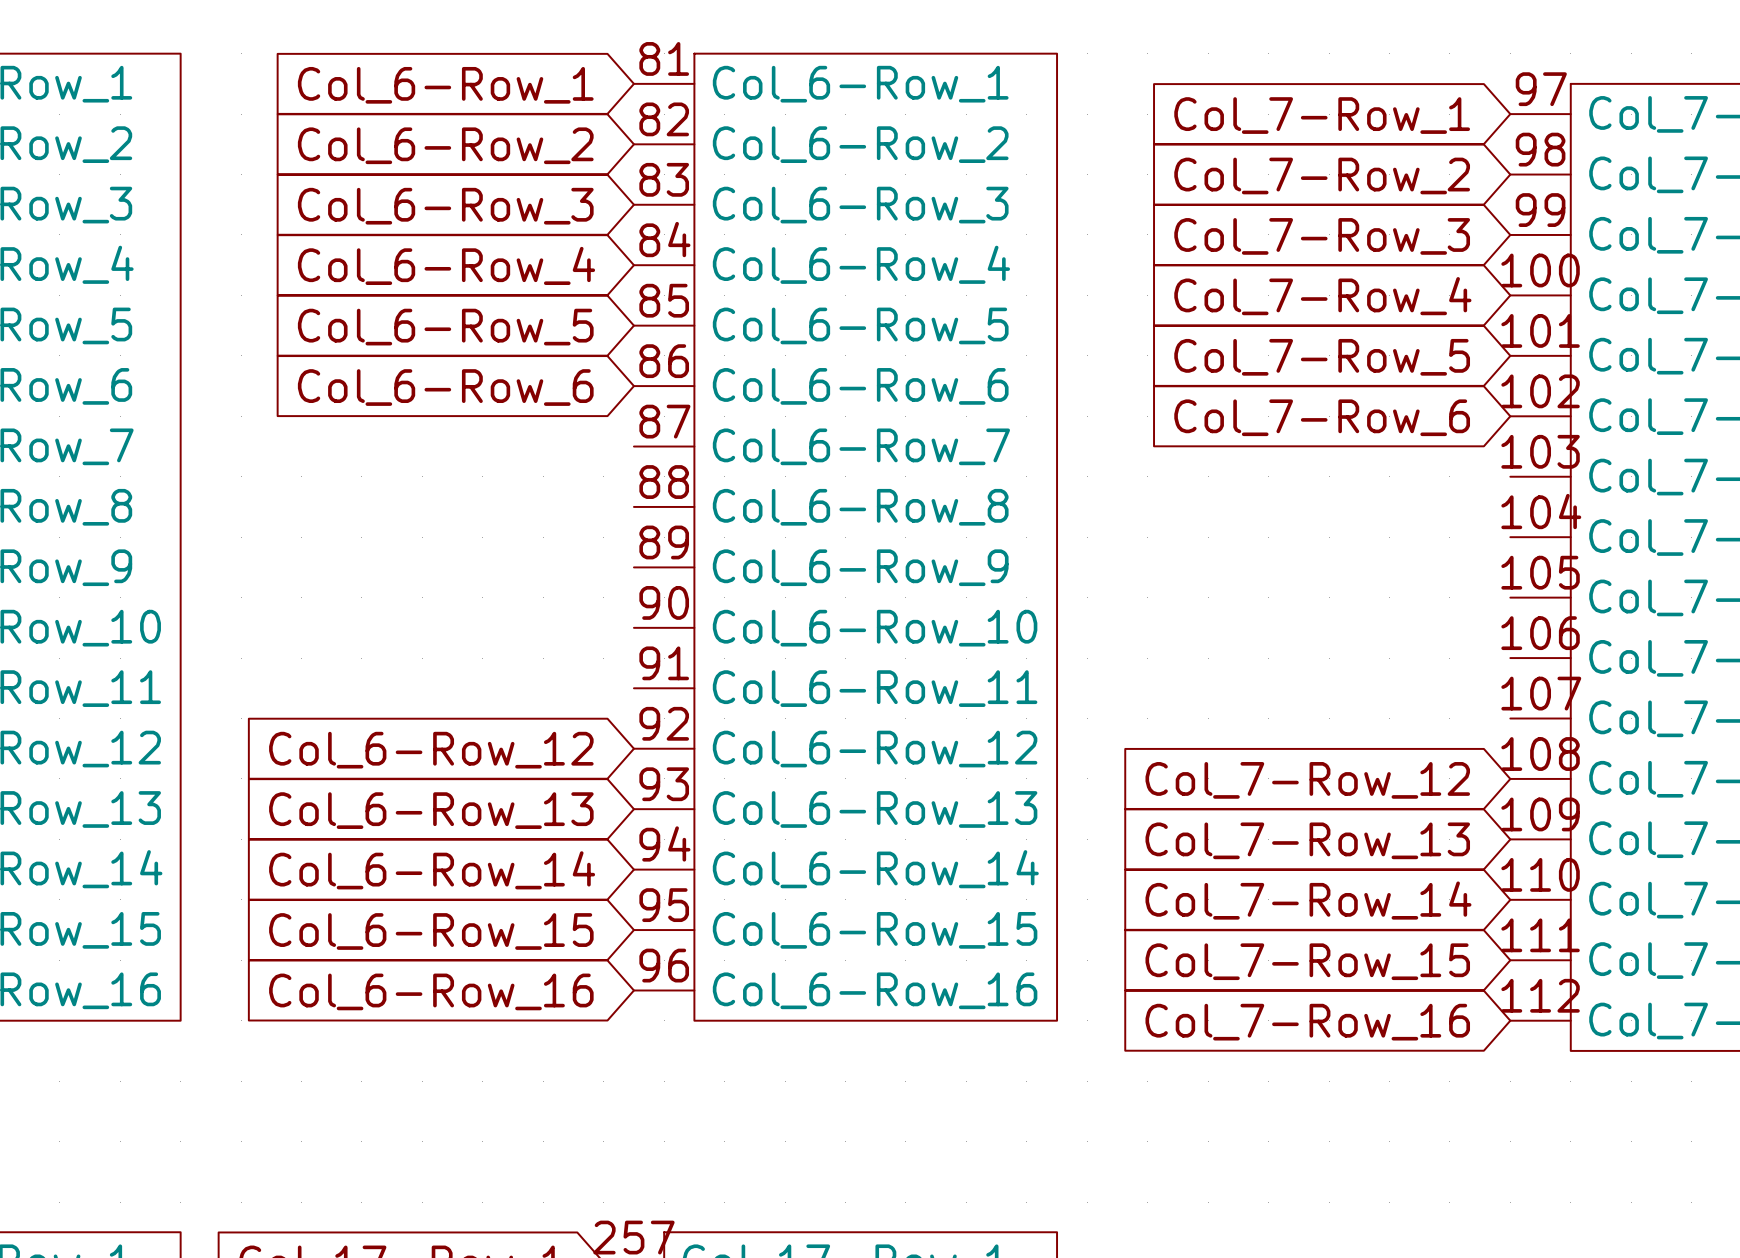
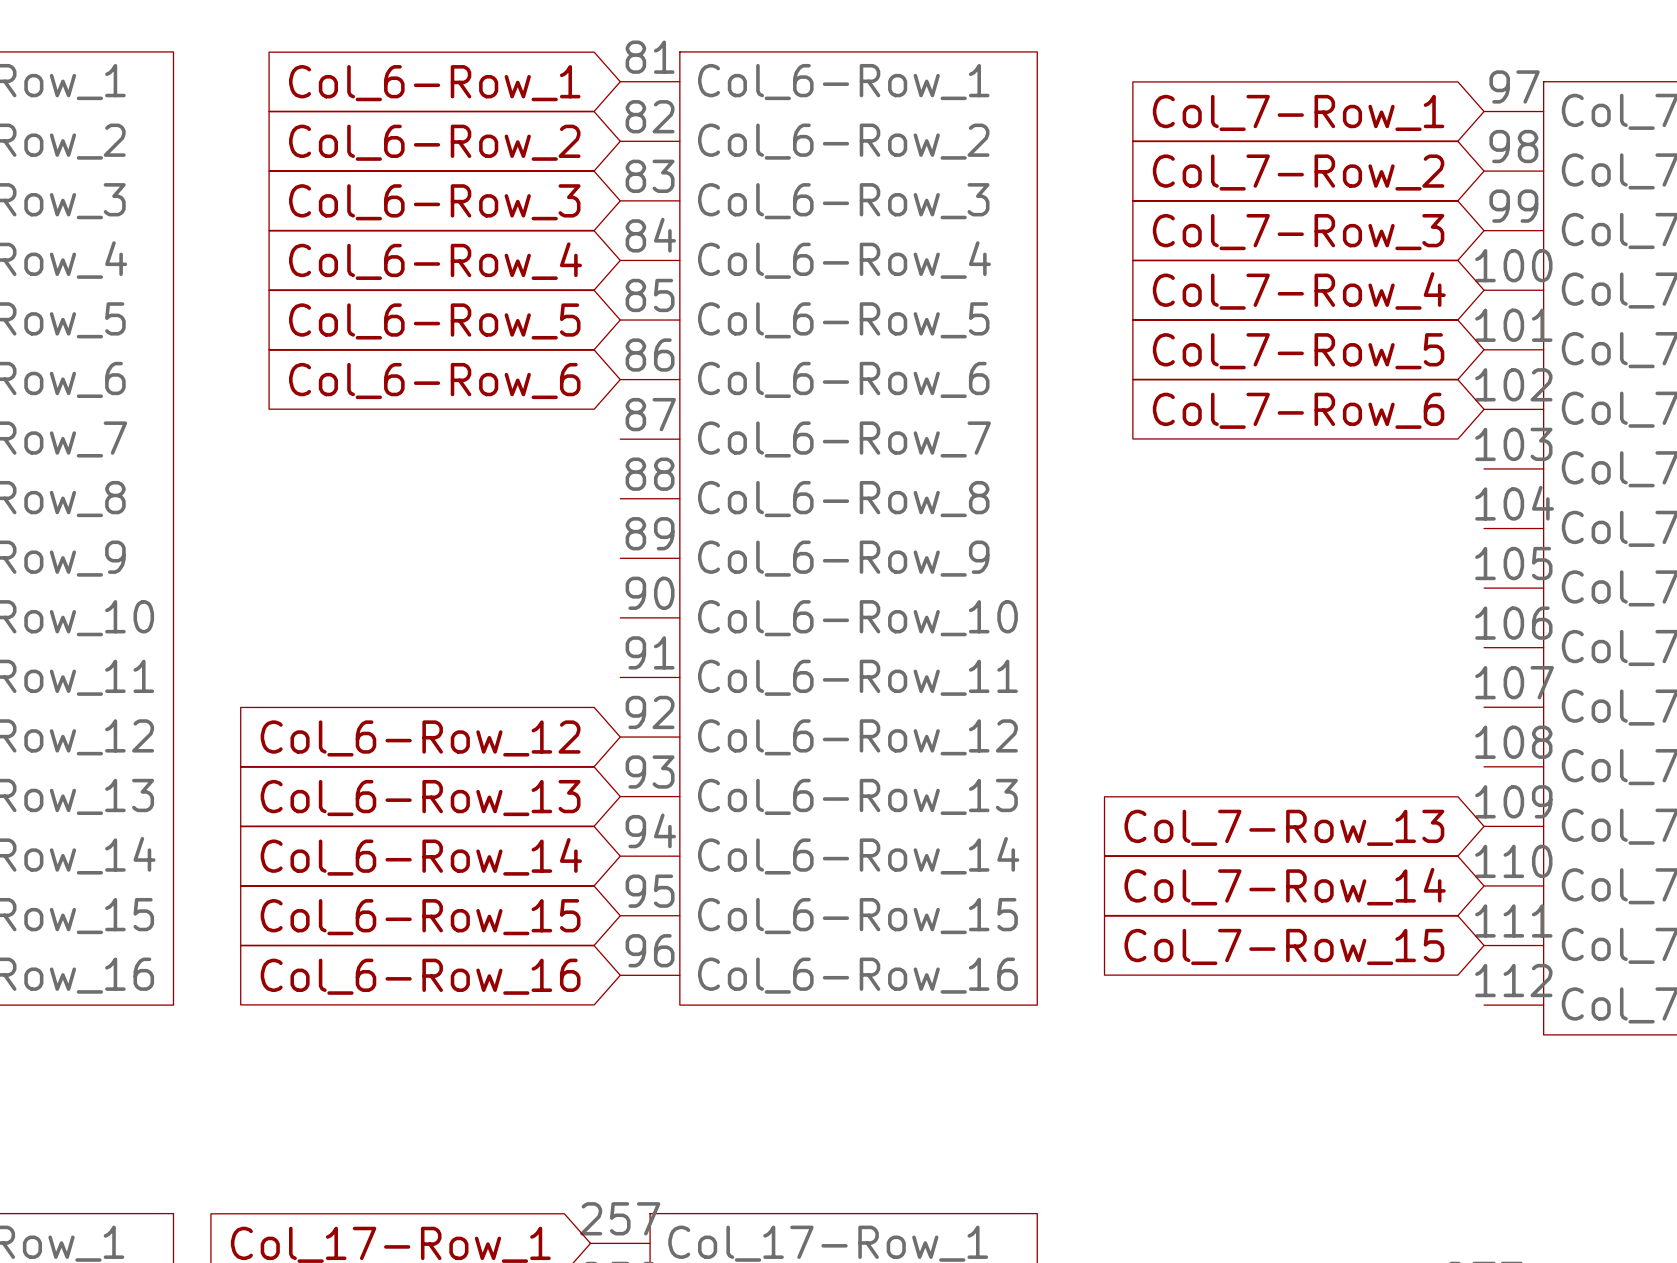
global label: Col_7-Row_12 (1307, 780) -> none
global label: Col_7-Row_16 (1307, 1022) -> none

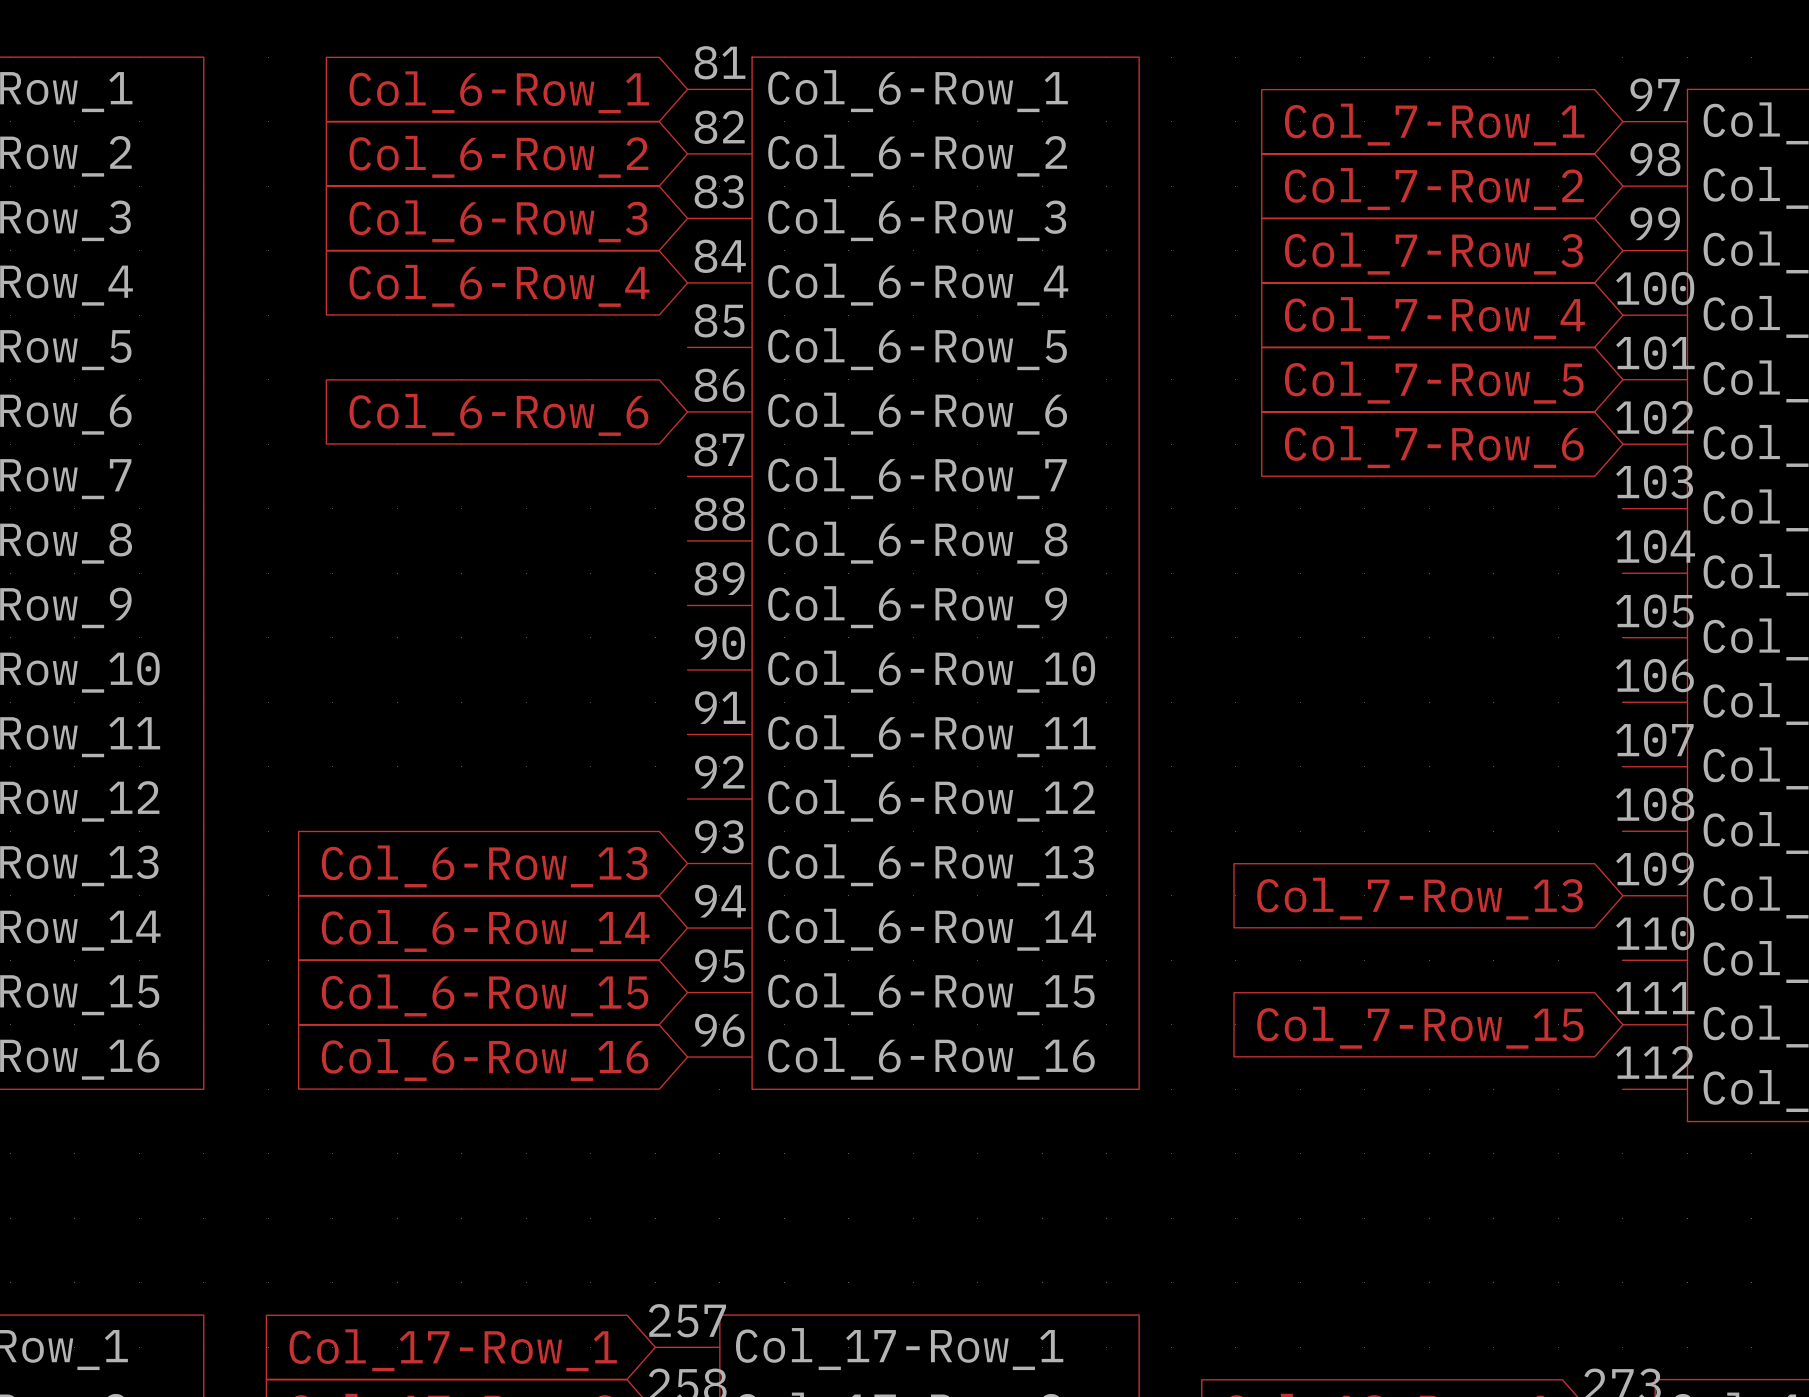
global label: Col_6-Row_5 (434, 321) -> none
global label: Col_6-Row_12 (420, 738) -> none
global label: Col_7-Row_14 (1285, 886) -> none

